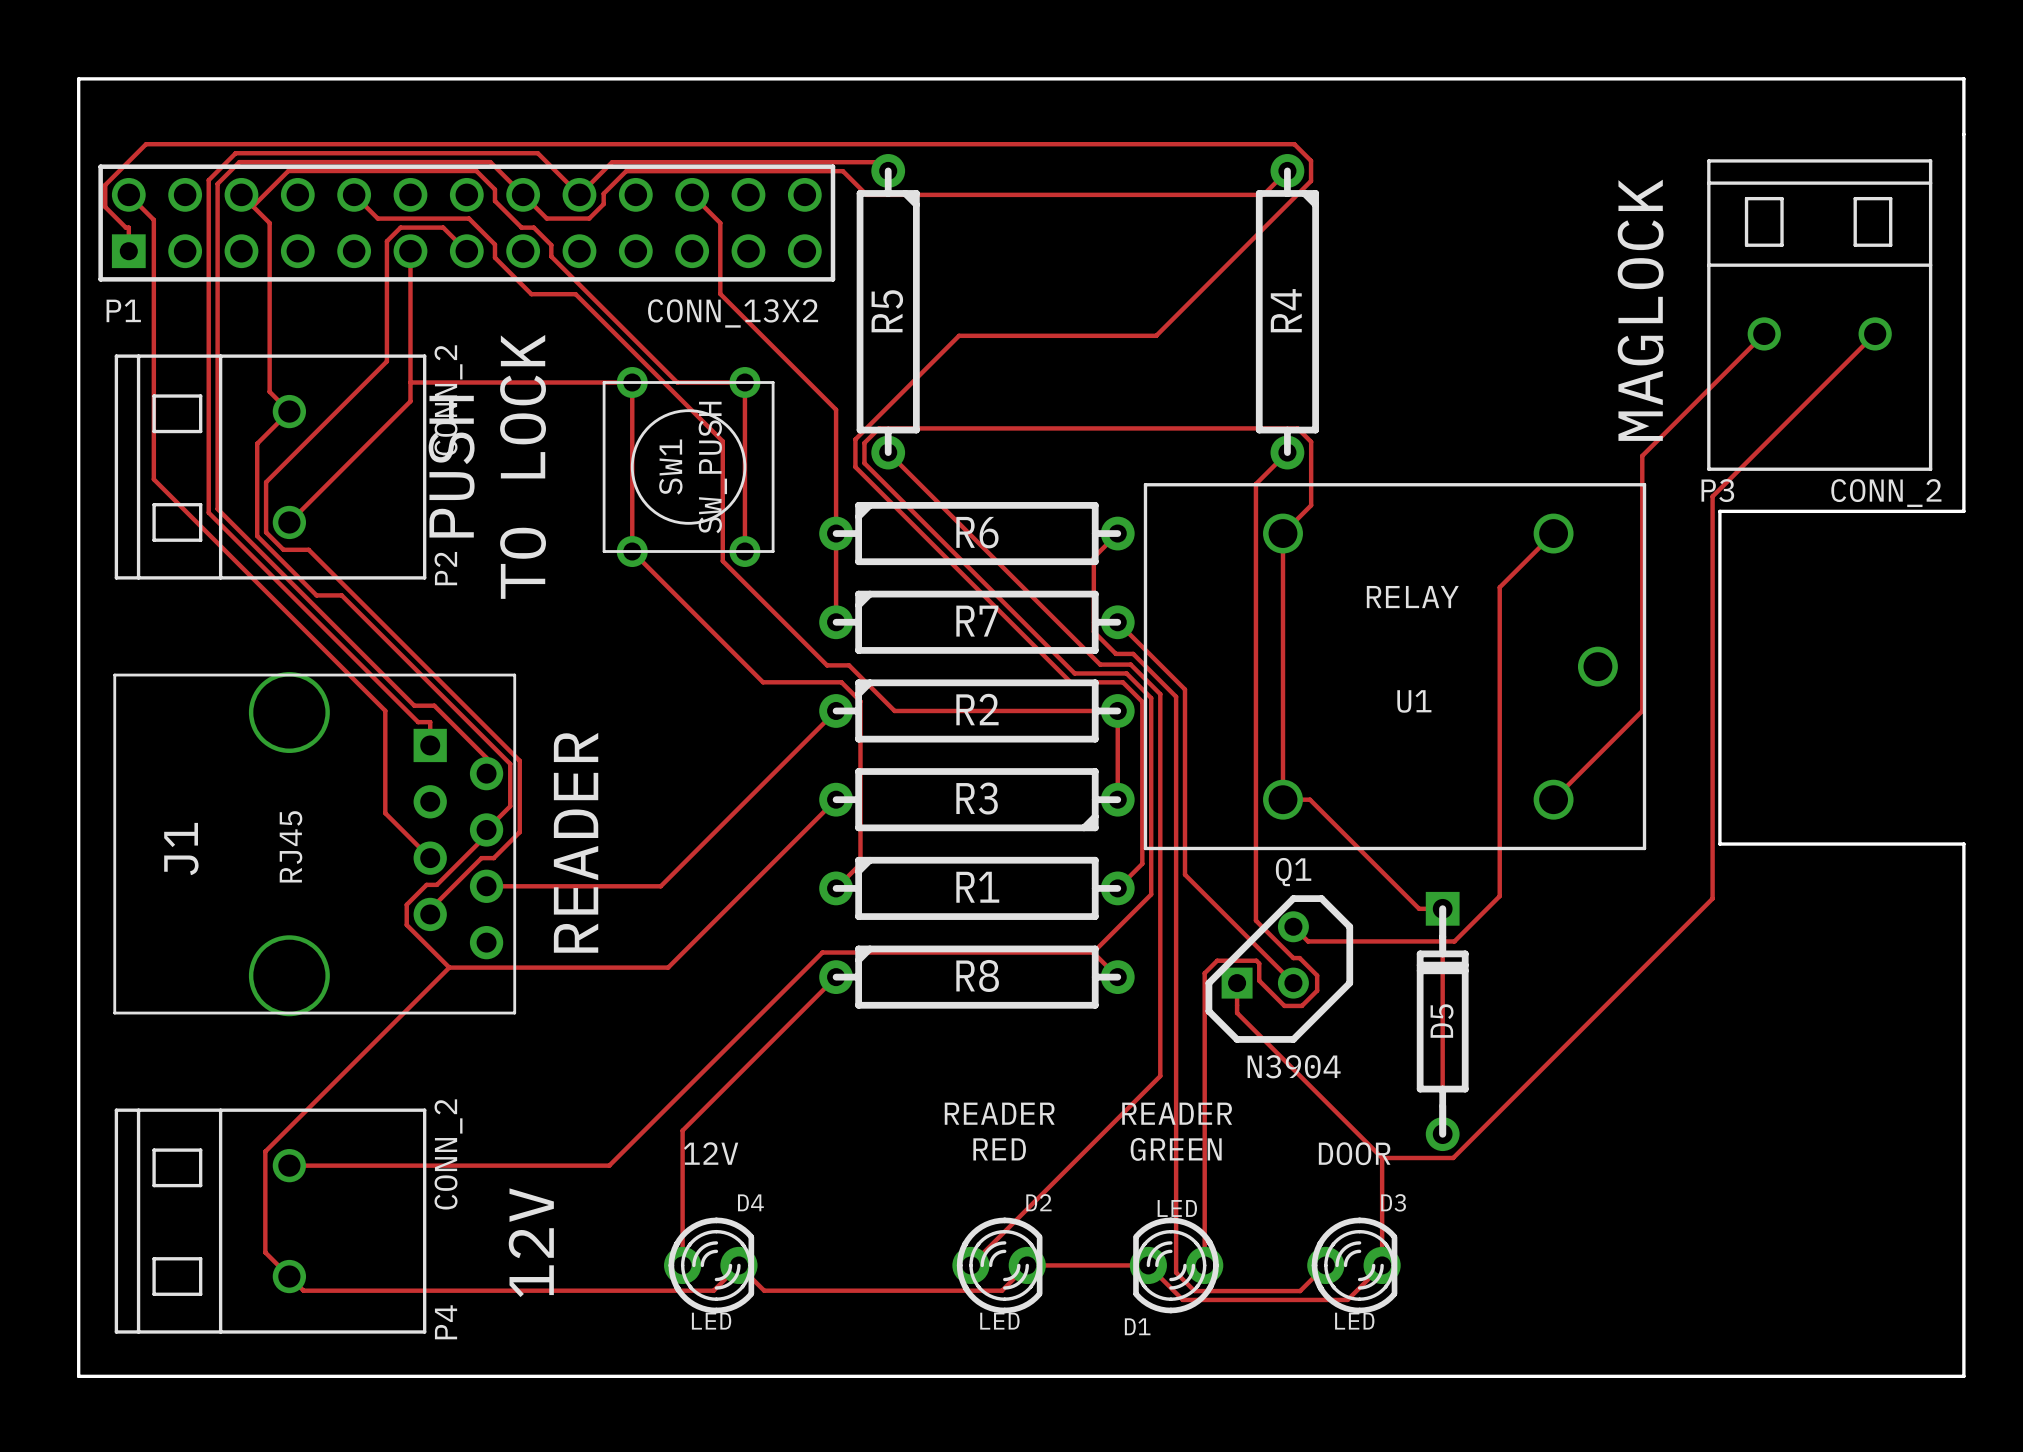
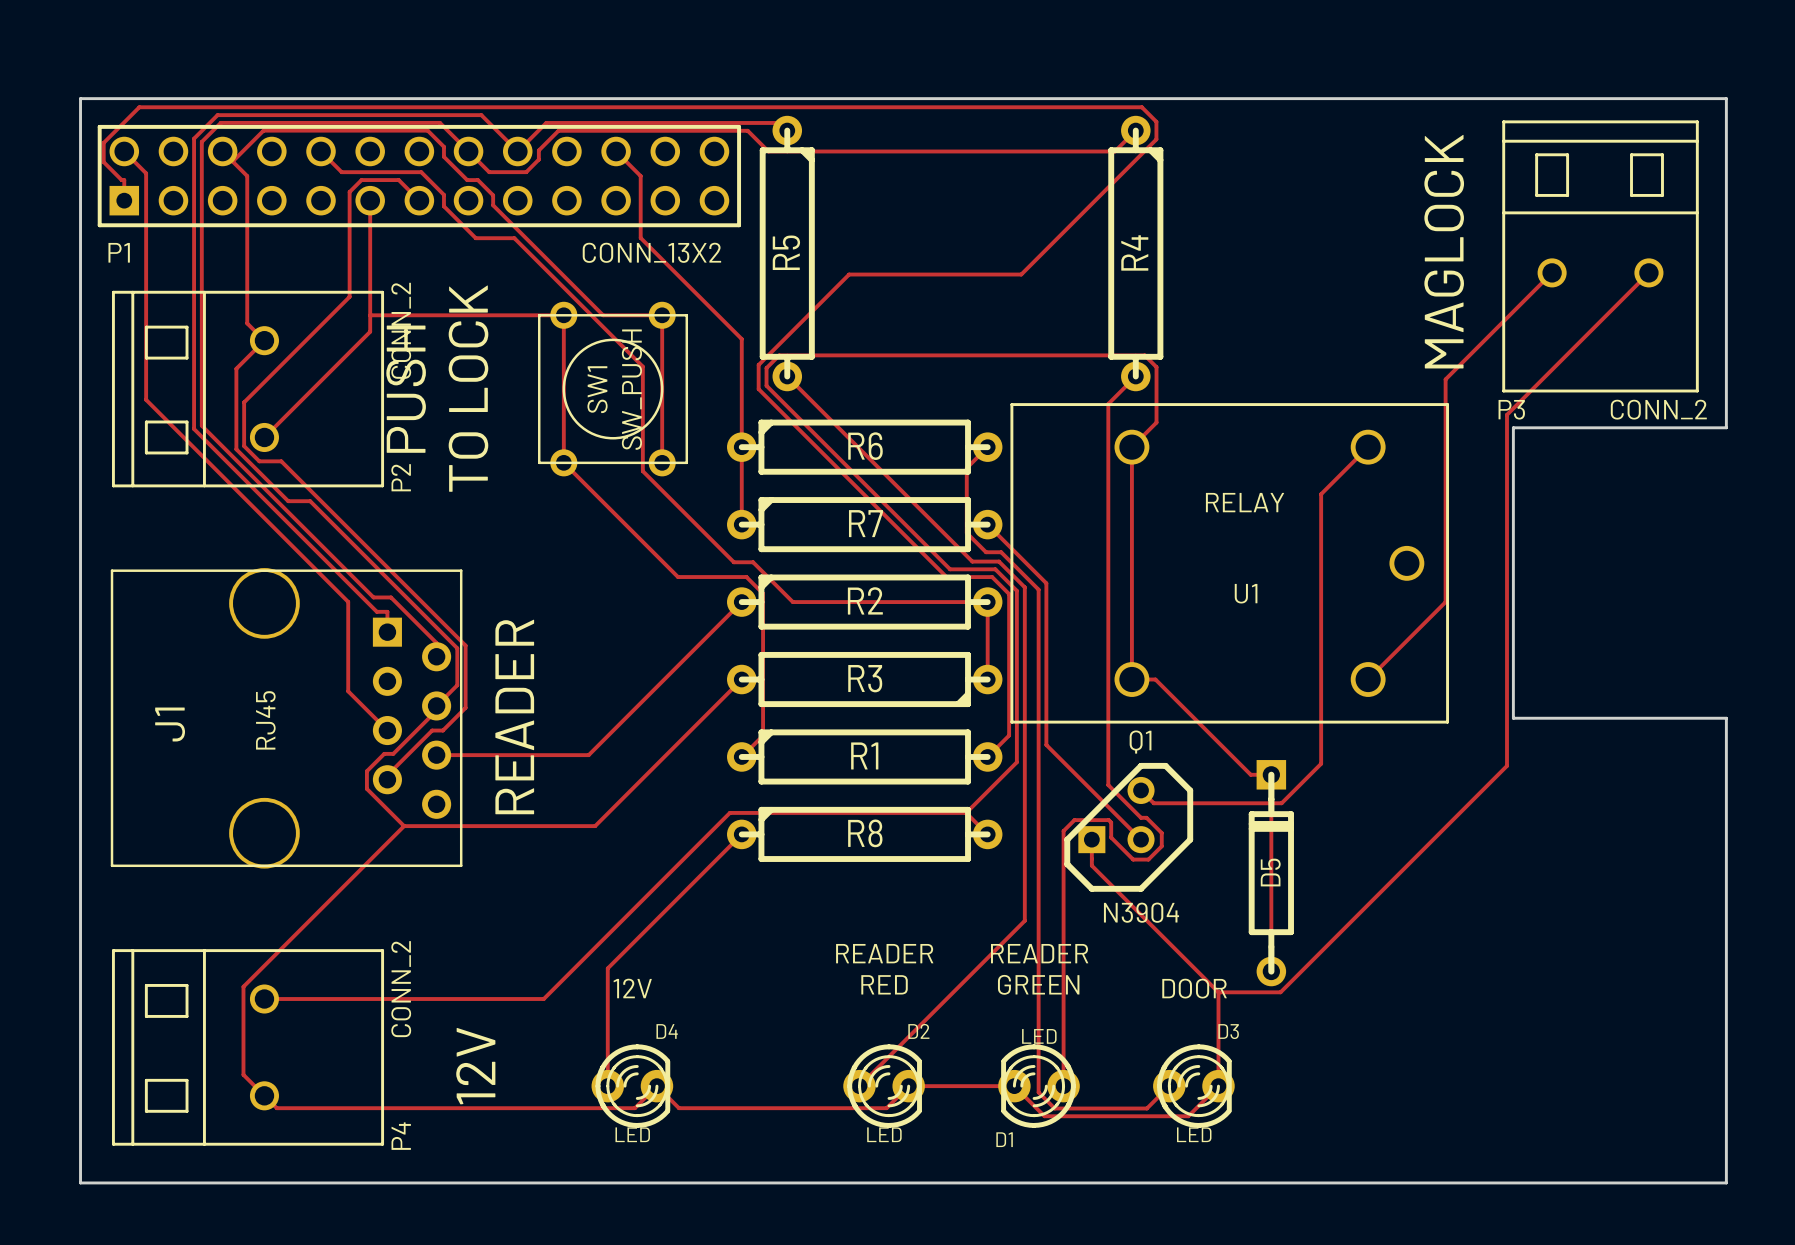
board edge: (78, 134) (78, 78) (1963, 78) (1963, 134) -> (80, 98) (1726, 98)

